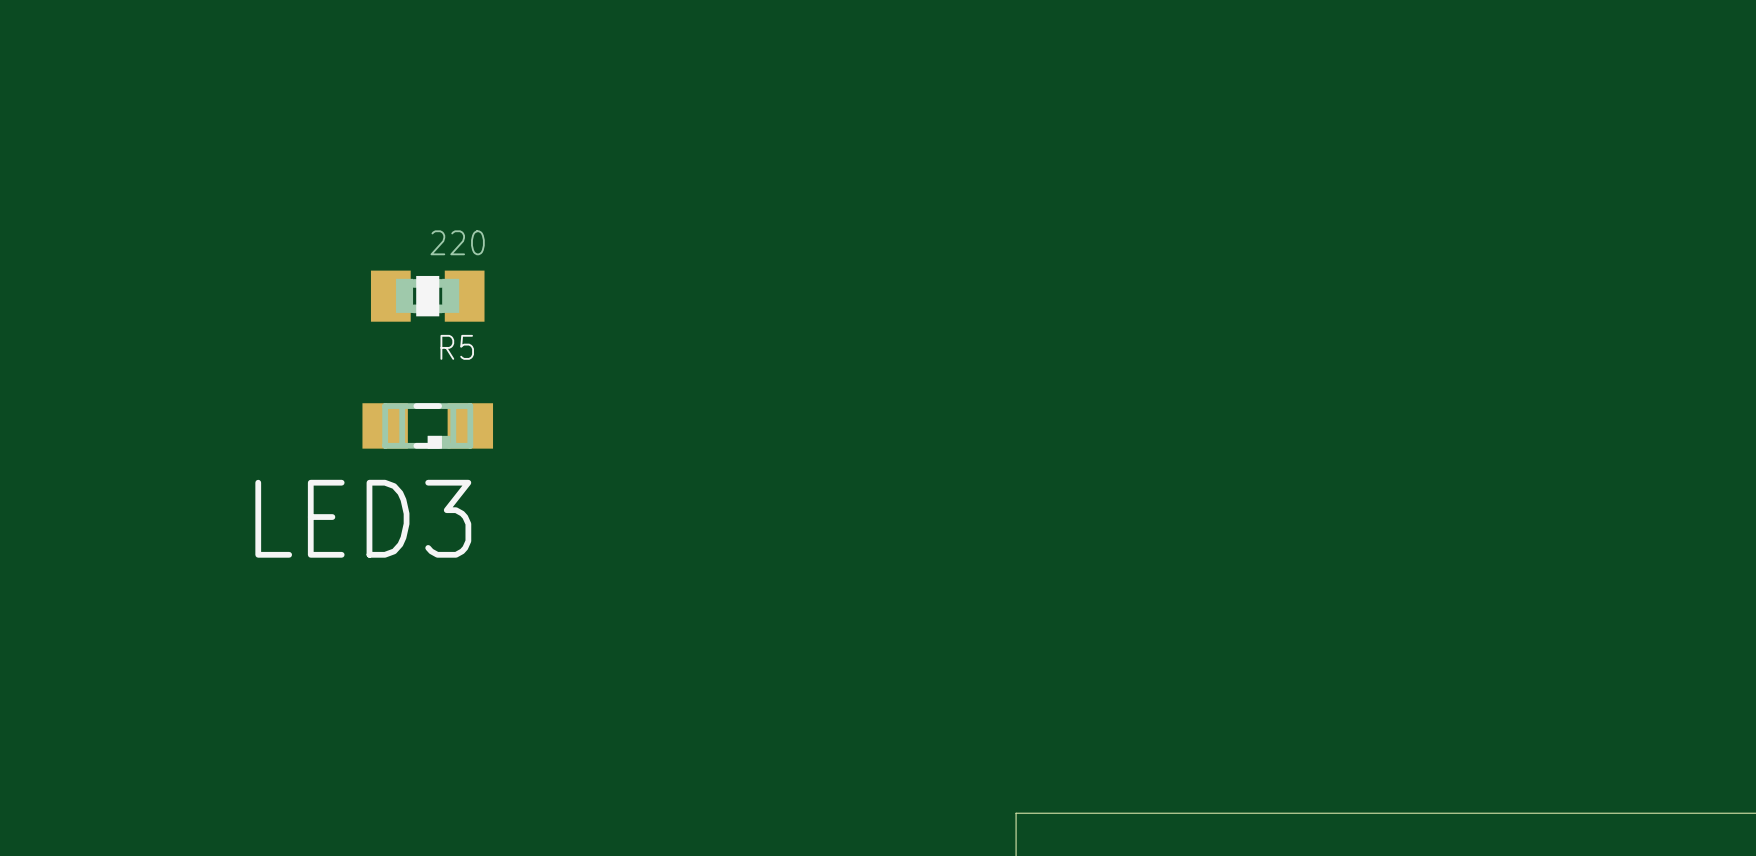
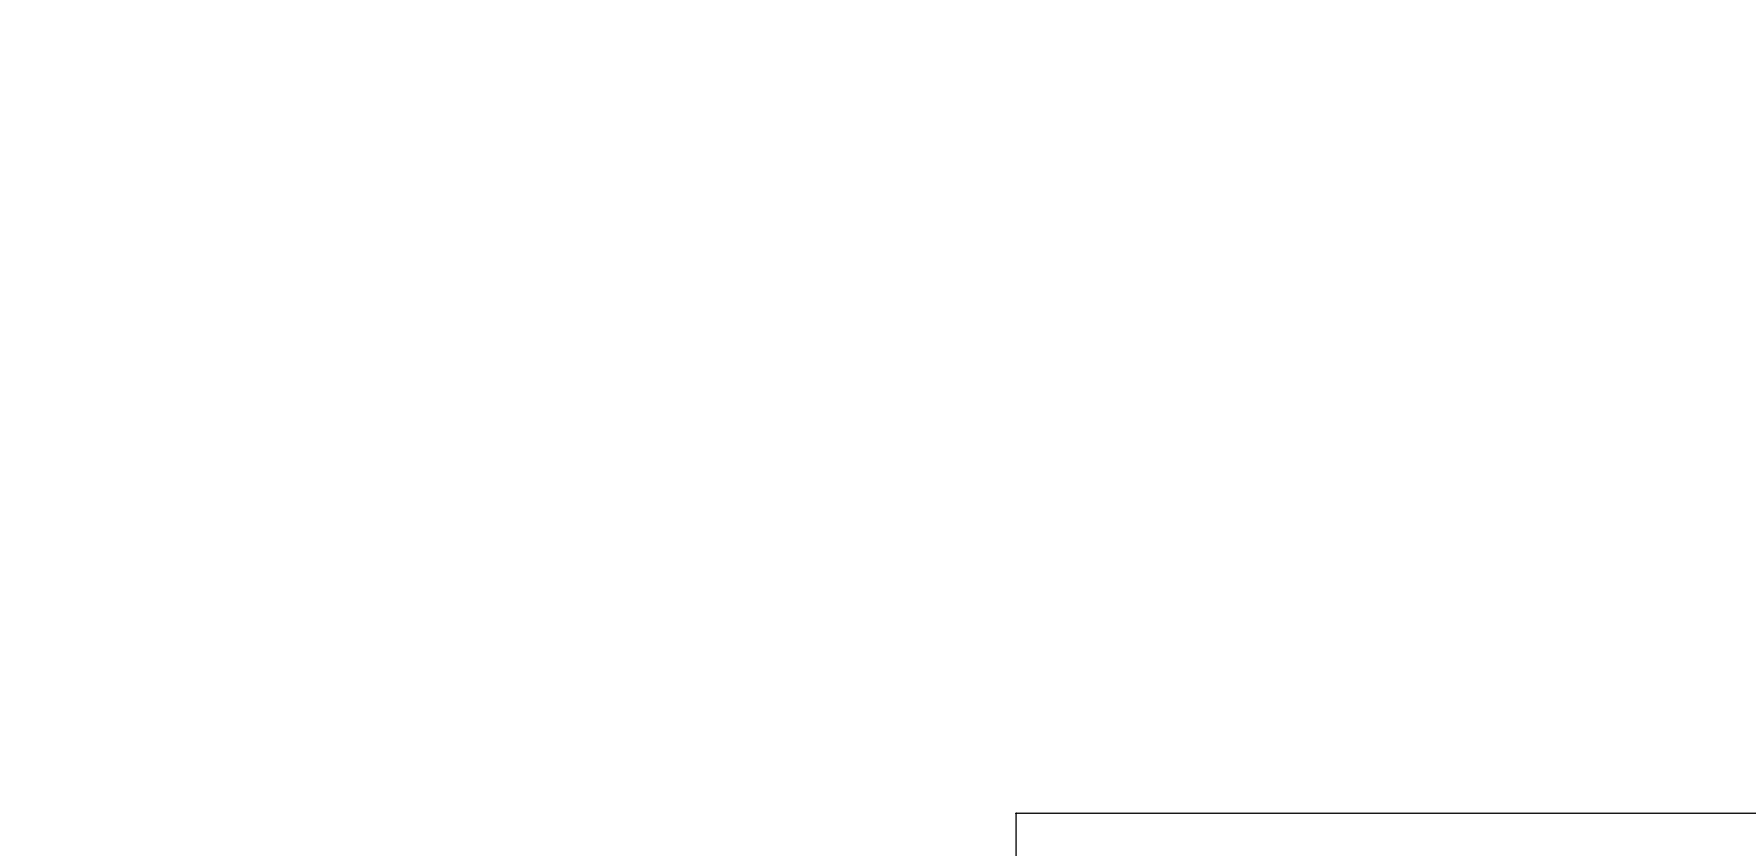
R5: 220 (427, 296) -> none
LED3: (427, 425) -> none

